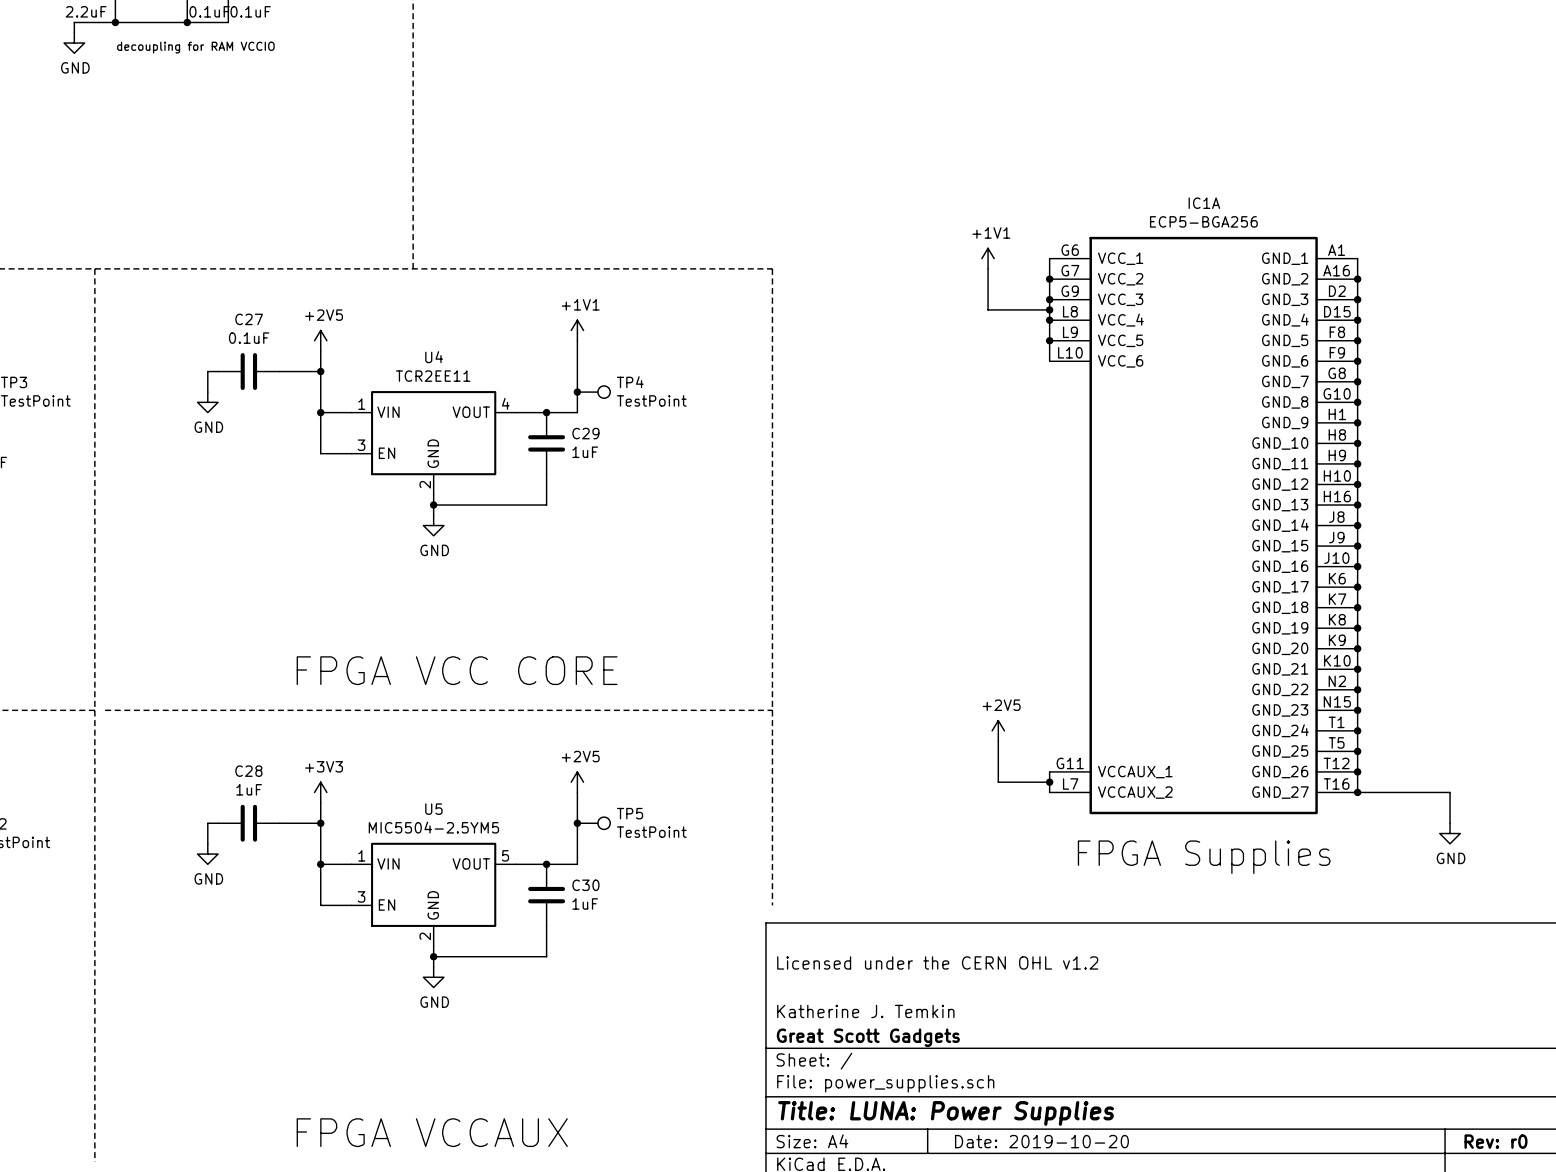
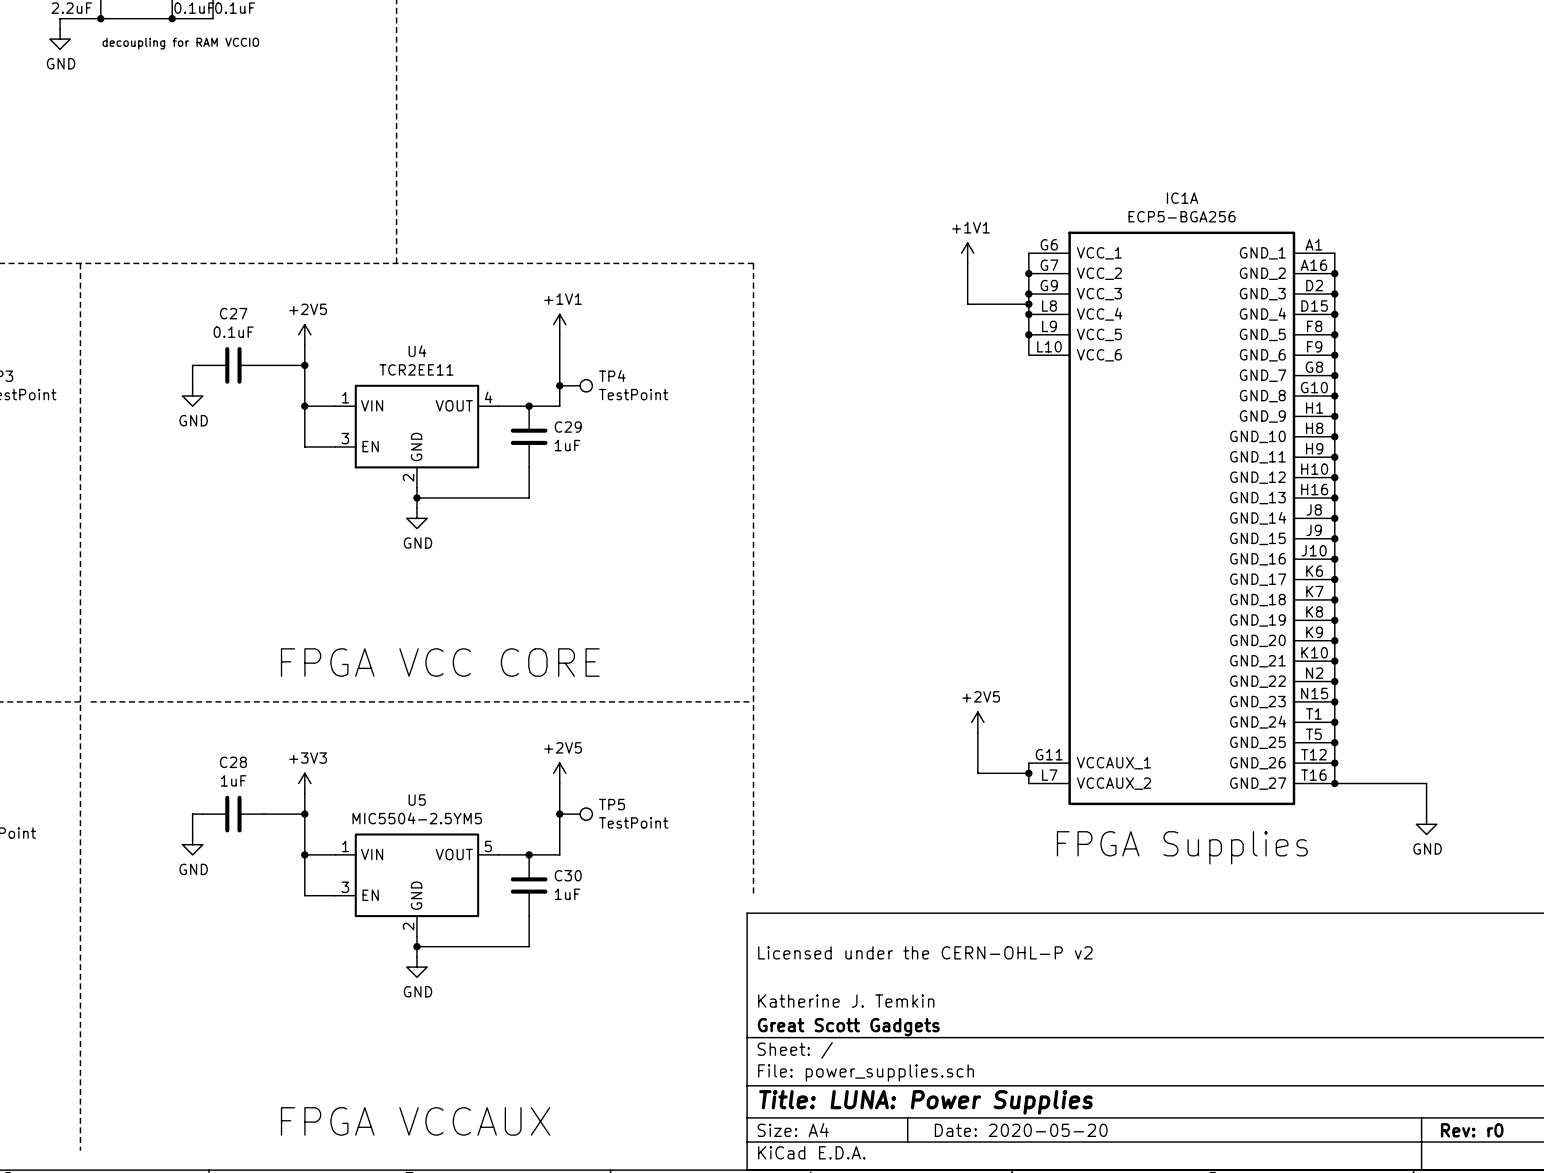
title block: Licensed under the CERN OHL v1.2 (937, 962) -> Licensed under the CERN-OHL-P v2 (925, 952)
title block: Date: 2019-10-20 (1041, 1141) -> Date: 2020-05-20 (1021, 1130)

